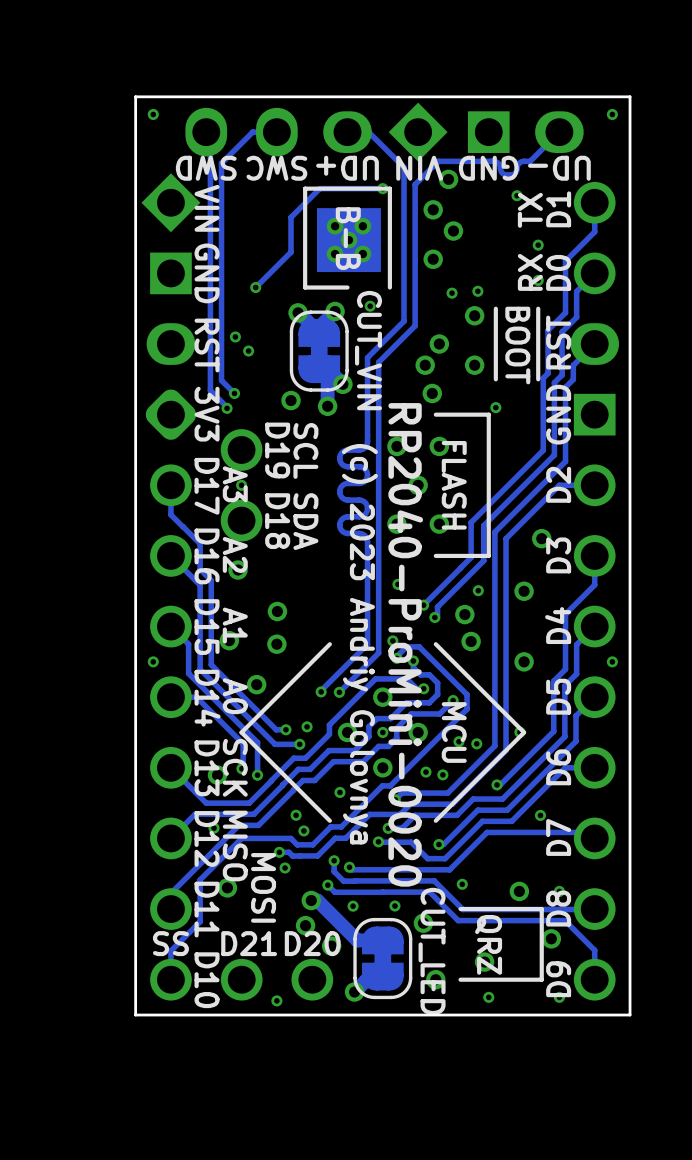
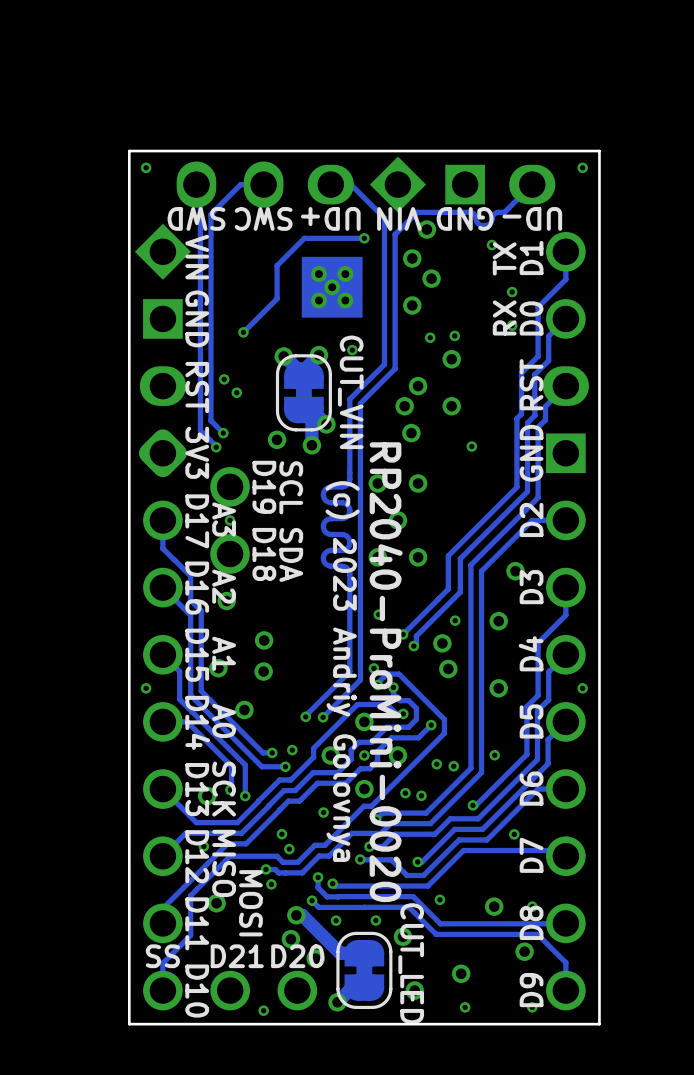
text: B-B (348, 238) -> none
line: (389, 287) (389, 188) (305, 188) (305, 287) (347, 287) -> none
line: (495, 308) (495, 379) -> none
line: (538, 308) (538, 379) -> none
text: BOOT (517, 345) -> none
line: (435, 414) (488, 414) (488, 555) (435, 555) -> none
text: FLASH (454, 485) -> none
line: (329, 644) (241, 732) (329, 820) -> none
line: (435, 644) (524, 732) (435, 820) -> none
text: MCU (454, 732) -> none
line: (460, 909) (541, 909) (541, 979) (460, 979) -> none
text: QRZ (488, 944) -> none

